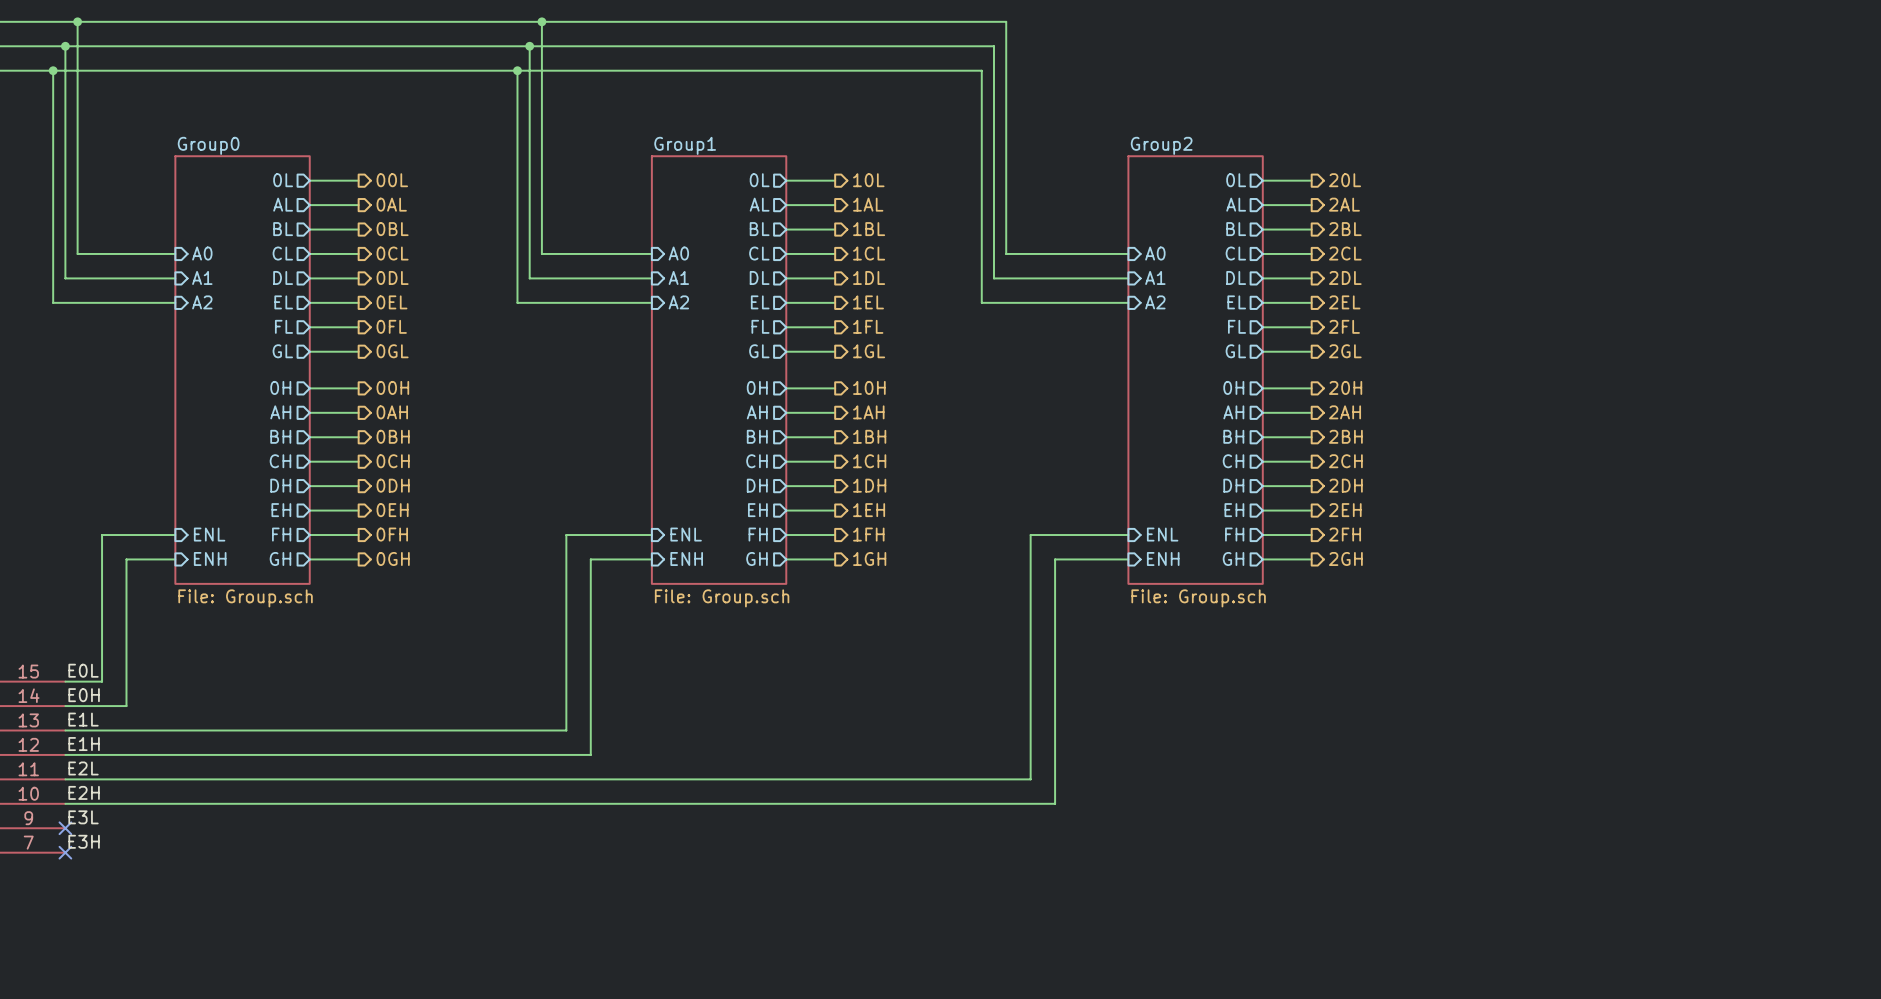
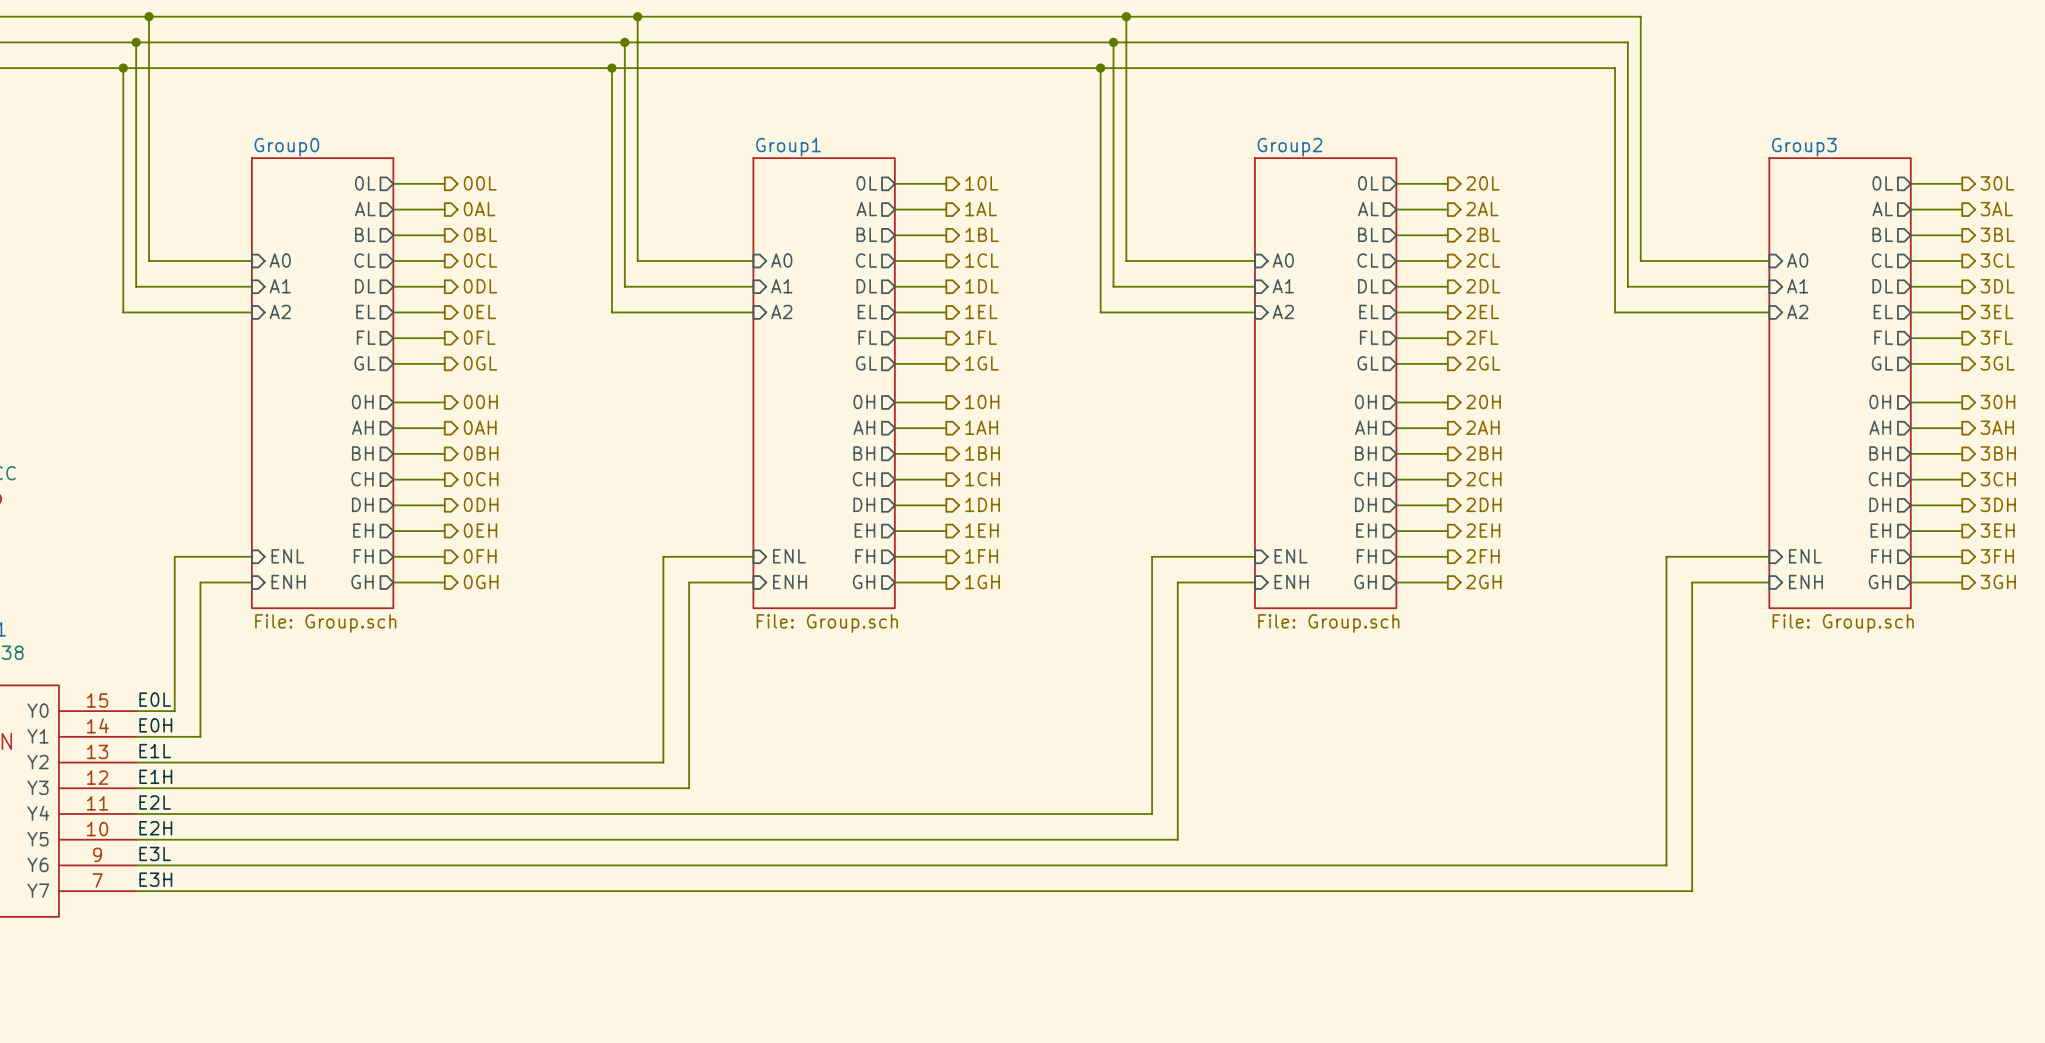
wire: none -> (1126, 16) (1640, 16) (1640, 261) (1769, 261)
junction: none -> (1126, 16)
wire: none -> (1113, 42) (1627, 42) (1627, 286) (1769, 286)
junction: none -> (1113, 42)
wire: none -> (1100, 68) (1615, 68) (1615, 312) (1769, 312)
junction: none -> (1100, 68)
sheet pin: none -> 0L (1882, 183)
wire: none -> (1910, 183) (1962, 183)
hierarchical label: none -> 30L (1997, 183)
sheet pin: none -> AL (1882, 209)
hierarchical label: none -> 3AL (1996, 209)
wire: none -> (1910, 209) (1962, 209)
sheet pin: none -> BL (1882, 234)
wire: none -> (1910, 235) (1962, 235)
hierarchical label: none -> 3BL (1997, 234)
sheet pin: none -> A0 (1797, 260)
sheet pin: none -> CL (1882, 260)
wire: none -> (1910, 261) (1962, 261)
hierarchical label: none -> 3CL (1997, 260)
sheet pin: none -> A1 (1797, 286)
sheet pin: none -> DL (1882, 286)
hierarchical label: none -> 3DL (1997, 286)
wire: none -> (1910, 286) (1962, 286)
sheet pin: none -> A2 (1797, 311)
sheet pin: none -> EL (1883, 311)
wire: none -> (1910, 312) (1962, 312)
hierarchical label: none -> 3EL (1997, 311)
sheet pin: none -> FL (1883, 337)
hierarchical label: none -> 3FL (1996, 337)
wire: none -> (1910, 338) (1962, 338)
sheet pin: none -> GL (1882, 363)
wire: none -> (1910, 363) (1962, 363)
hierarchical label: none -> 3GL (1997, 363)
sheet Group3: none -> File: Group.sch (1840, 383)
sheet pin: none -> 0H (1880, 401)
hierarchical label: none -> 30H (1997, 401)
wire: none -> (1910, 402) (1962, 402)
sheet pin: none -> AH (1880, 427)
wire: none -> (1910, 428) (1962, 428)
hierarchical label: none -> 3AH (1997, 427)
sheet pin: none -> BH (1880, 453)
hierarchical label: none -> 3BH (1998, 453)
wire: none -> (1910, 453) (1962, 453)
sheet pin: none -> CH (1879, 479)
wire: none -> (1910, 479) (1962, 479)
hierarchical label: none -> 3CH (1998, 479)
sheet pin: none -> DH (1880, 504)
hierarchical label: none -> 3DH (1998, 504)
wire: none -> (1910, 505) (1962, 505)
sheet pin: none -> EH (1880, 530)
wire: none -> (1910, 531) (1962, 531)
hierarchical label: none -> 3EH (1997, 530)
sheet pin: none -> ENL (1805, 556)
sheet pin: none -> FH (1881, 556)
hierarchical label: none -> 3FH (1997, 556)
wire: none -> (1769, 556) (1666, 556) (1666, 865) (136, 865)
wire: none -> (1910, 556) (1962, 556)
sheet pin: none -> ENH (1805, 582)
sheet pin: none -> GH (1879, 582)
hierarchical label: none -> 3GH (1998, 582)
wire: none -> (1769, 582) (1692, 582) (1692, 891) (136, 891)
wire: none -> (1910, 582) (1962, 582)
no-connect mark: (65, 828) -> none
no-connect mark: (65, 852) -> none

